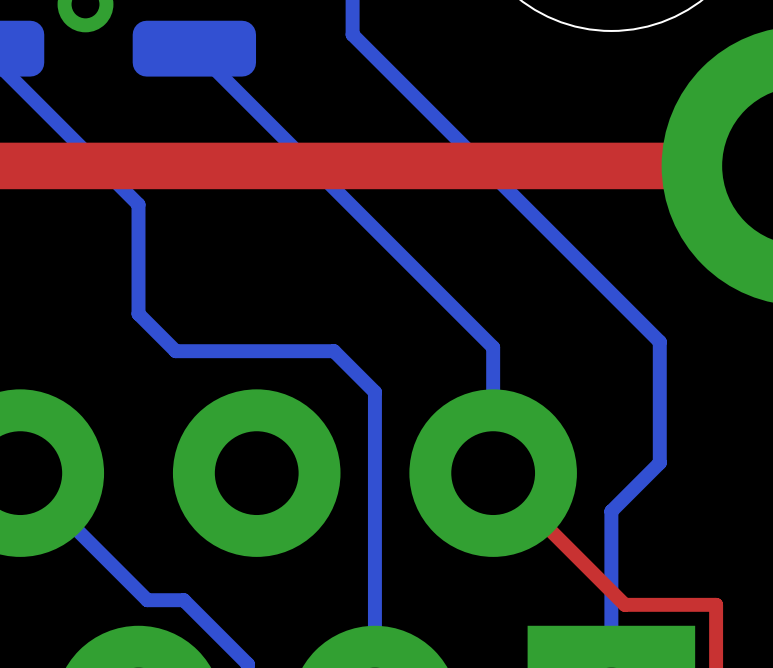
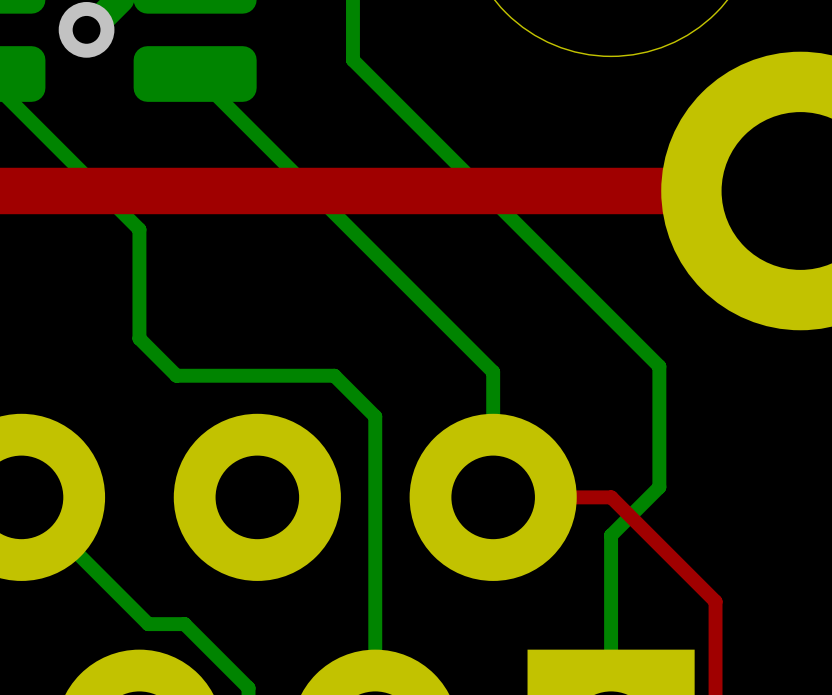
top track: (493, 473) (624, 604) (716, 604) -> (493, 497) (611, 497) (715, 601) (715, 628)

